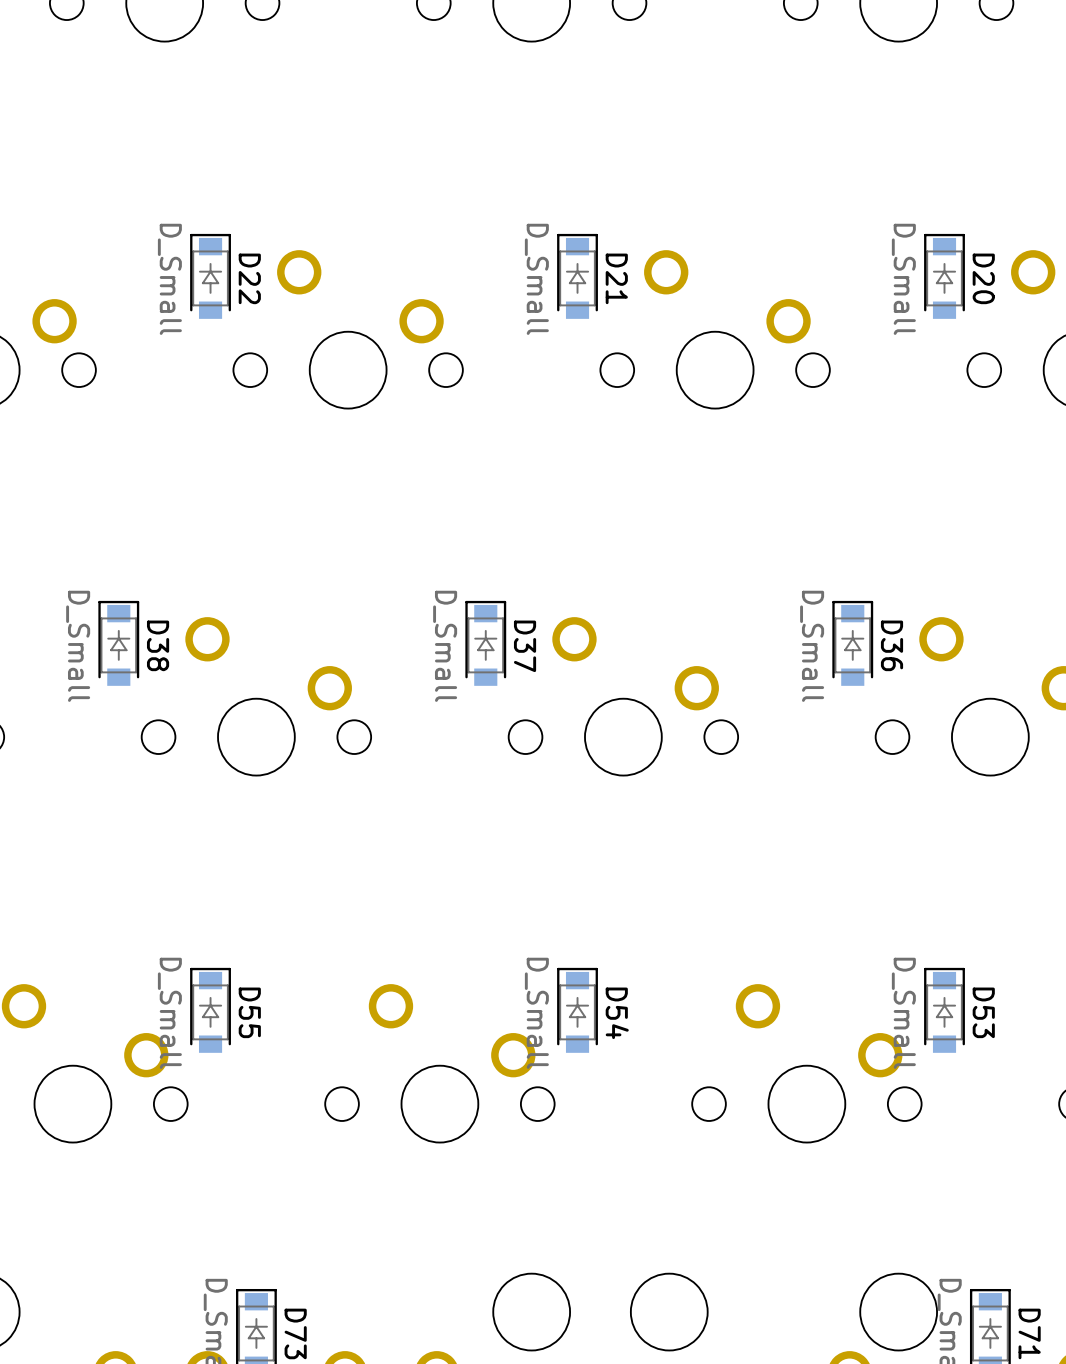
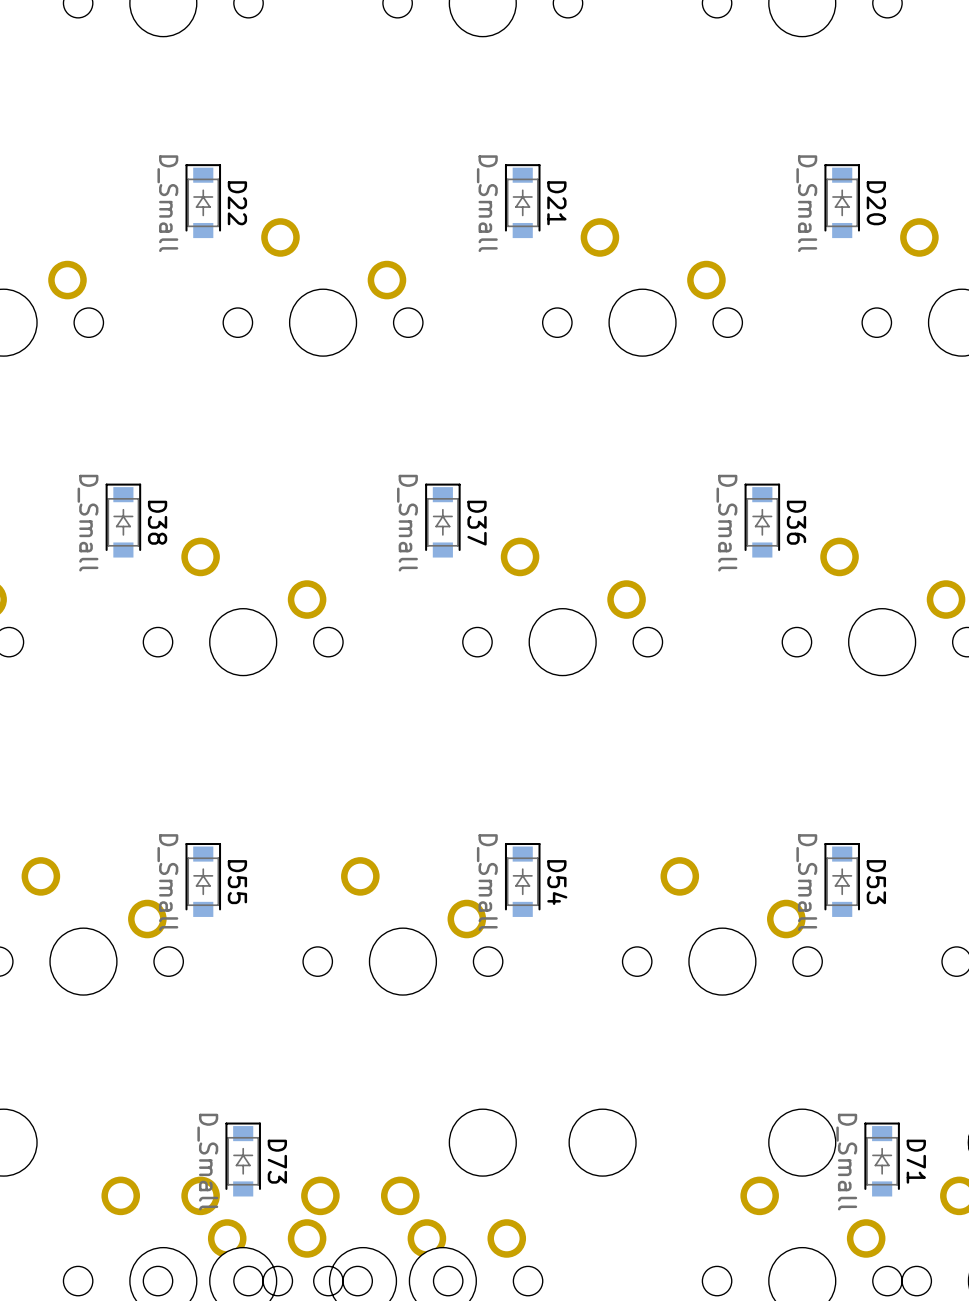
D22 position: (210, 276) -> (203, 201)
D21 position: (577, 276) -> (522, 201)
D20 position: (944, 276) -> (842, 201)
D38 position: (118, 643) -> (123, 520)
D37 position: (485, 643) -> (442, 520)
D36 position: (852, 643) -> (762, 520)

